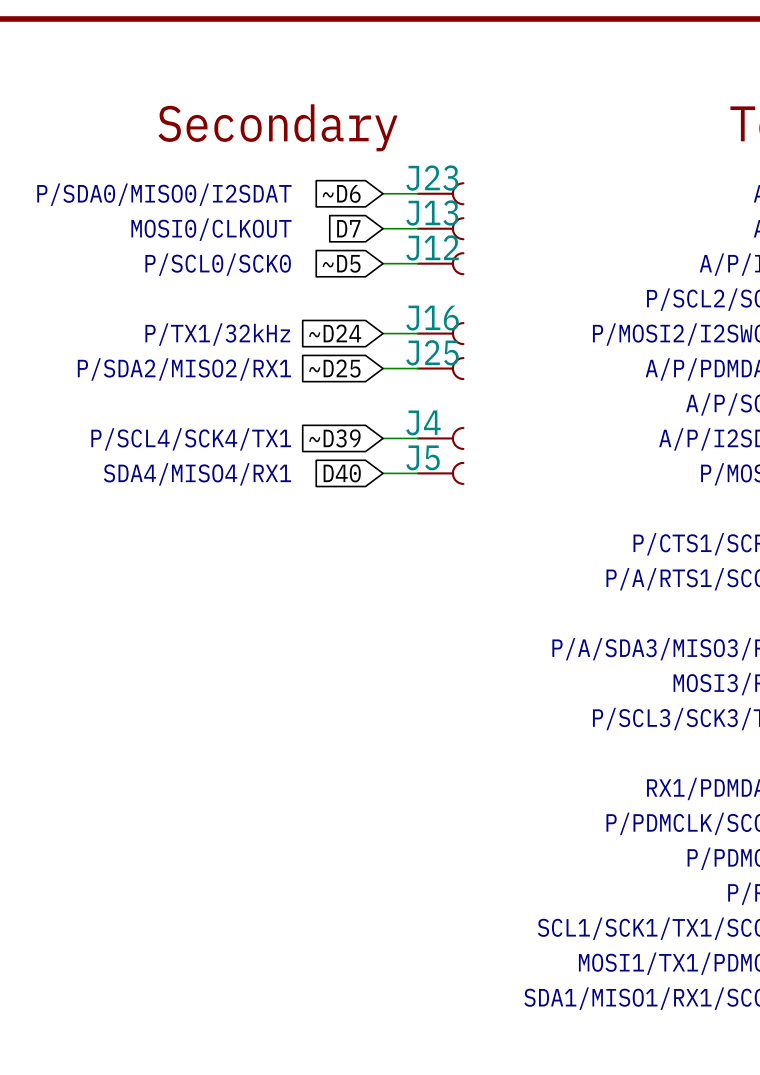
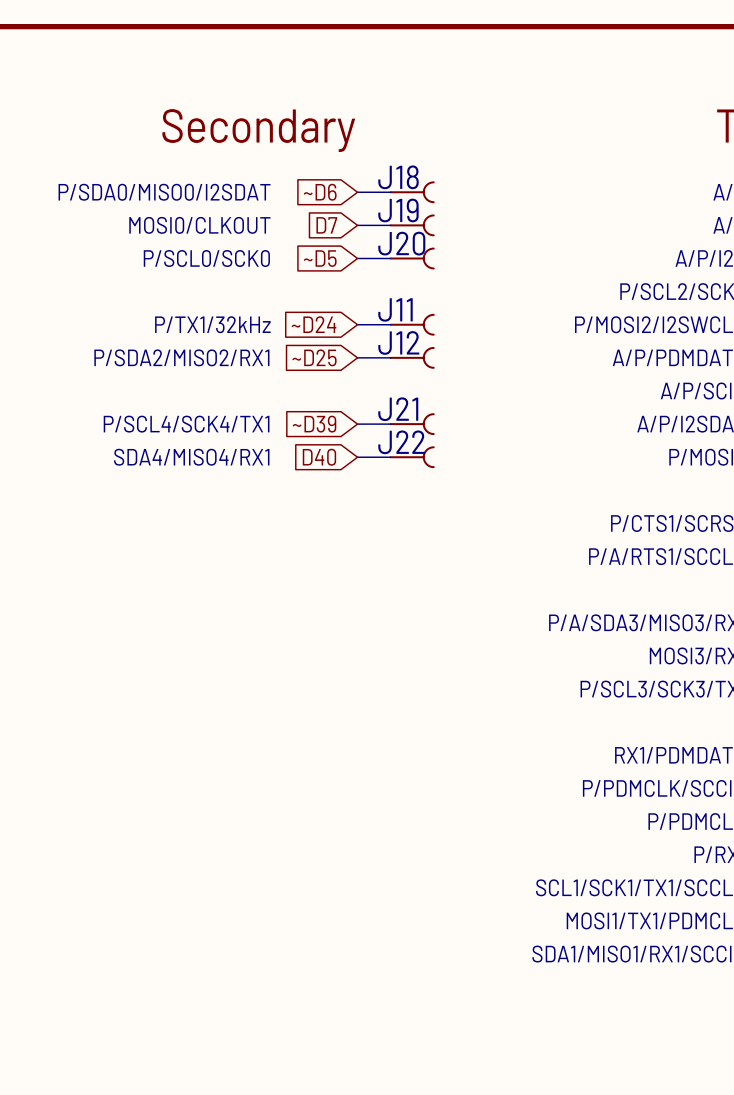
J23 name: J23 (432, 178) -> J18 (398, 177)
J13 name: J13 (432, 212) -> J19 (398, 210)
J12 name: J12 (432, 247) -> J20 (401, 243)
J16 name: J16 (432, 318) -> J11 (395, 309)
J25 name: J25 (432, 352) -> J12 (398, 342)
J4 name: J4 (423, 422) -> J21 (398, 409)
J5 name: J5 (423, 457) -> J22 (401, 442)

